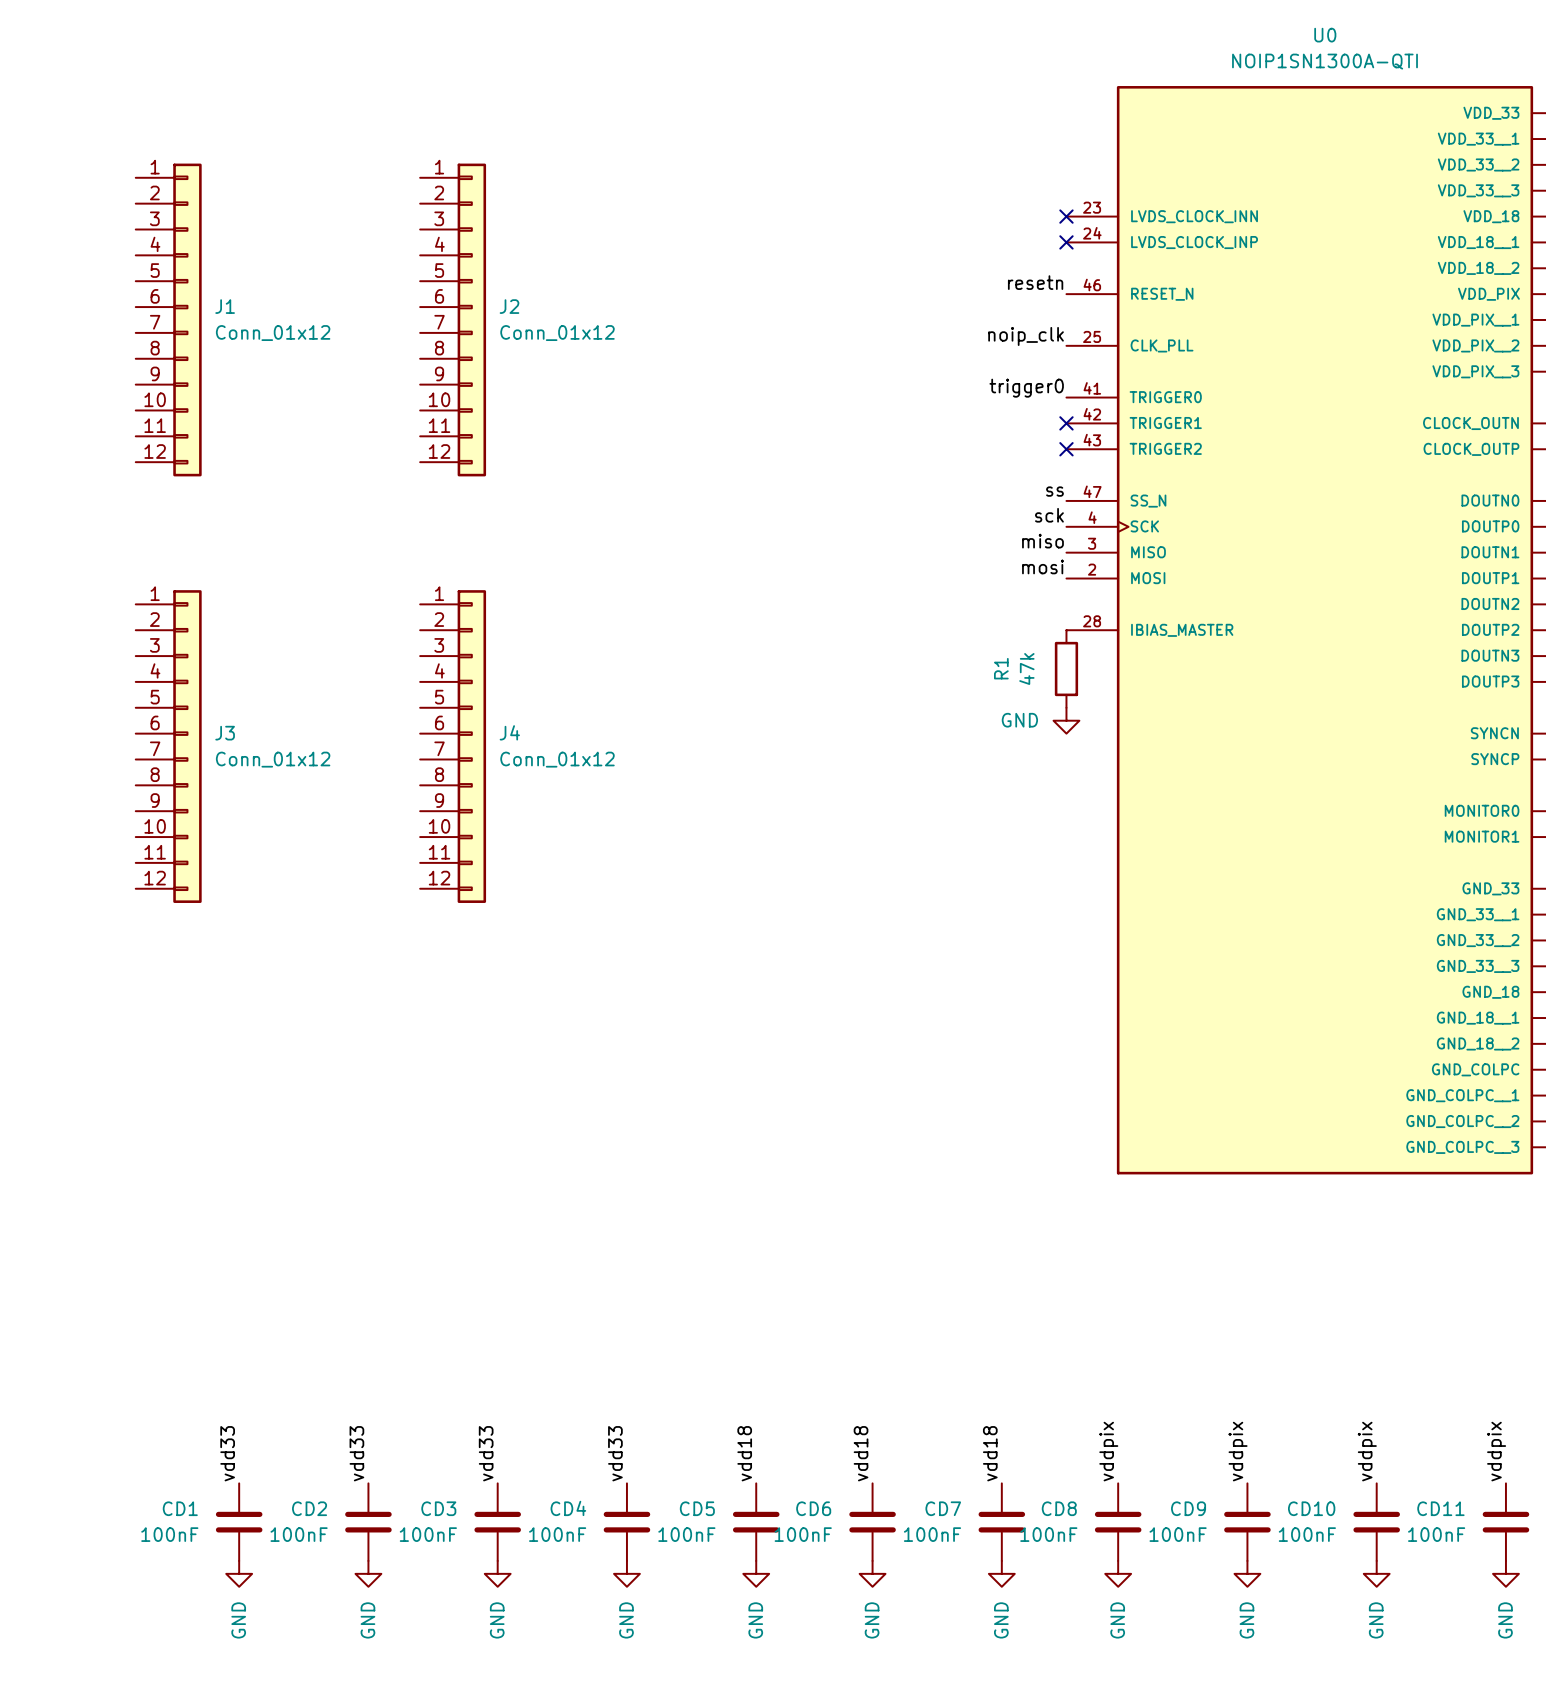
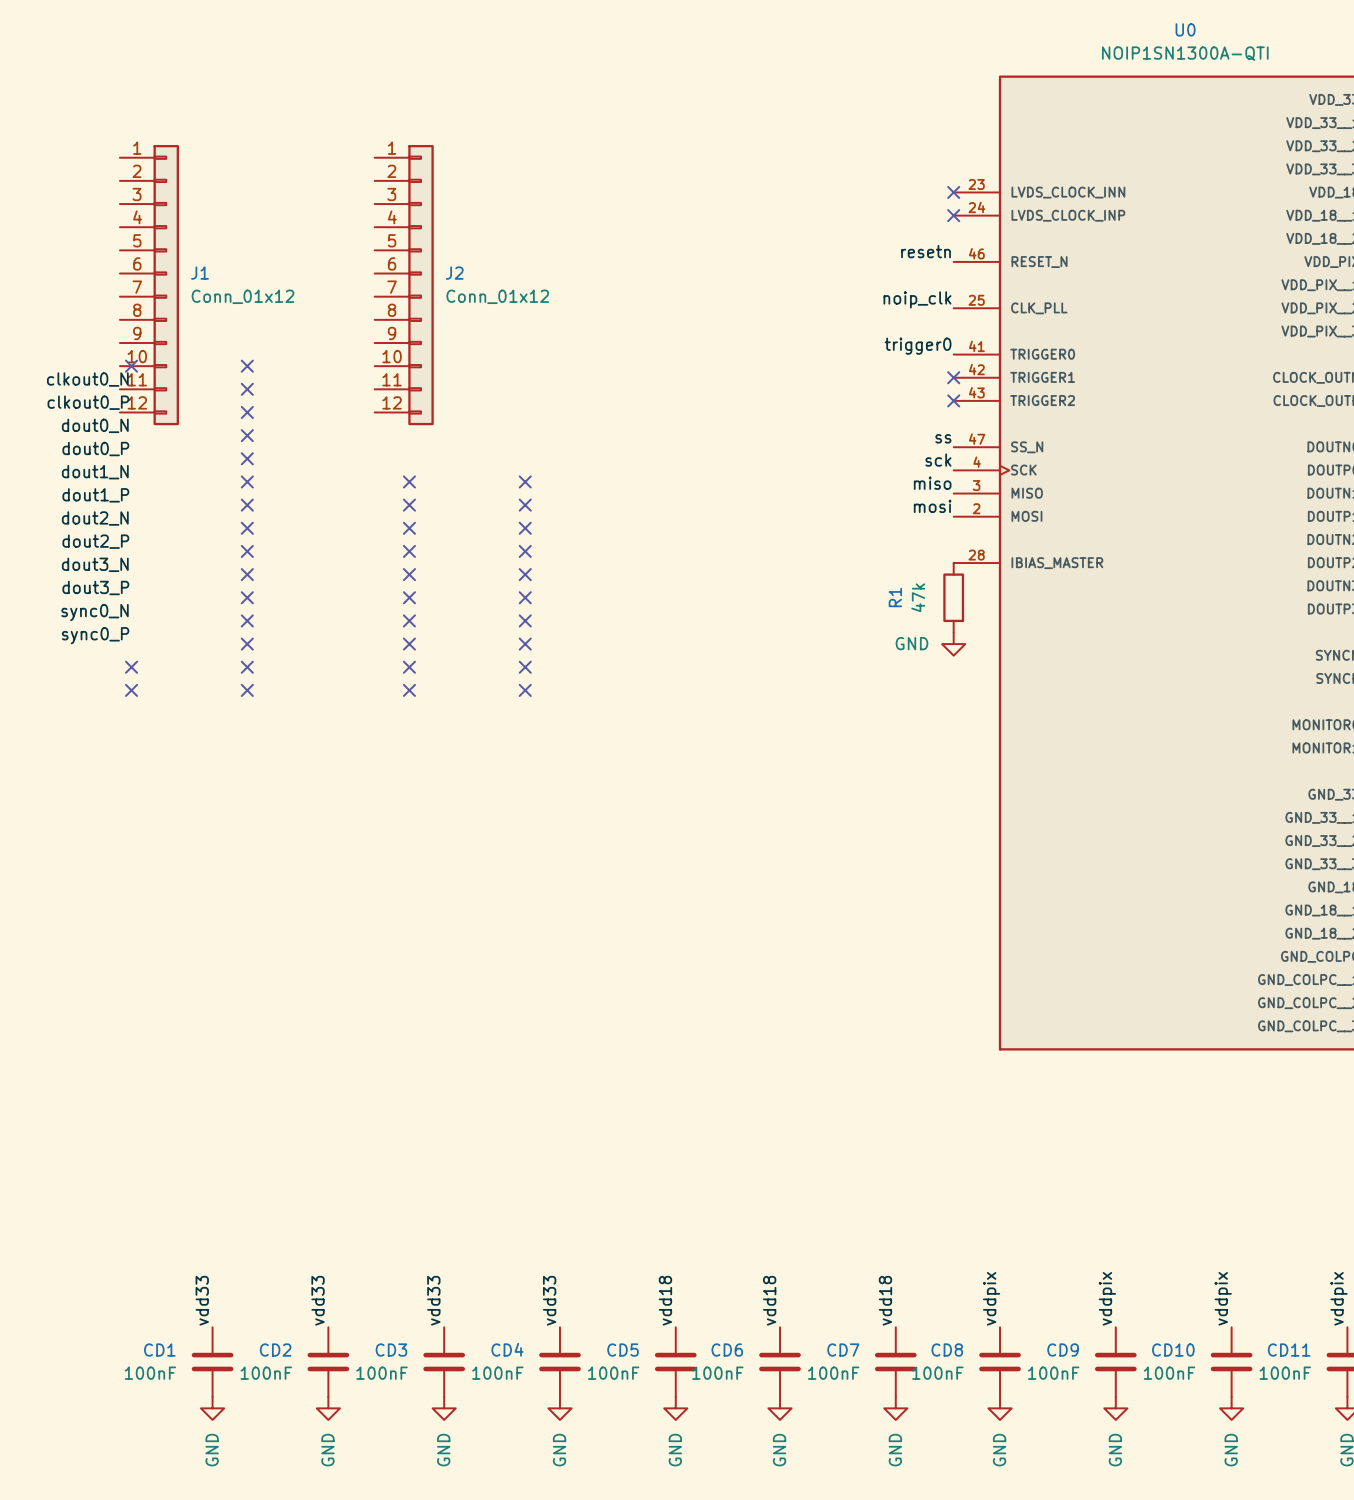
no-connect mark: none -> (131, 366)
no-connect mark: none -> (247, 366)
label: none -> clkout0_N (87, 379)
no-connect mark: none -> (247, 389)
label: none -> clkout0_P (88, 402)
no-connect mark: none -> (247, 412)
label: none -> dout0_N (95, 425)
no-connect mark: none -> (247, 435)
label: none -> dout0_P (95, 449)
no-connect mark: none -> (247, 458)
label: none -> dout1_N (95, 472)
no-connect mark: none -> (247, 481)
no-connect mark: none -> (409, 481)
no-connect mark: none -> (525, 481)
label: none -> dout1_P (95, 495)
no-connect mark: none -> (247, 505)
no-connect mark: none -> (409, 505)
no-connect mark: none -> (525, 505)
label: none -> dout2_N (95, 518)
no-connect mark: none -> (247, 528)
no-connect mark: none -> (409, 528)
no-connect mark: none -> (525, 528)
label: none -> dout2_P (95, 541)
no-connect mark: none -> (247, 551)
no-connect mark: none -> (409, 551)
no-connect mark: none -> (525, 551)
label: none -> dout3_N (95, 564)
no-connect mark: none -> (247, 574)
no-connect mark: none -> (409, 574)
no-connect mark: none -> (525, 574)
label: none -> dout3_P (95, 587)
no-connect mark: none -> (247, 597)
no-connect mark: none -> (409, 597)
no-connect mark: none -> (525, 597)
label: none -> sync0_N (95, 612)
no-connect mark: none -> (247, 620)
no-connect mark: none -> (409, 620)
no-connect mark: none -> (525, 620)
label: none -> sync0_P (95, 635)
no-connect mark: none -> (247, 644)
no-connect mark: none -> (409, 644)
no-connect mark: none -> (525, 644)
no-connect mark: none -> (131, 667)
J3: Conn_01x12 (168, 746) -> none
no-connect mark: none -> (247, 667)
J4: Conn_01x12 (453, 746) -> none
no-connect mark: none -> (409, 667)
no-connect mark: none -> (525, 667)
no-connect mark: none -> (131, 690)
no-connect mark: none -> (247, 690)
no-connect mark: none -> (409, 690)
no-connect mark: none -> (525, 690)

